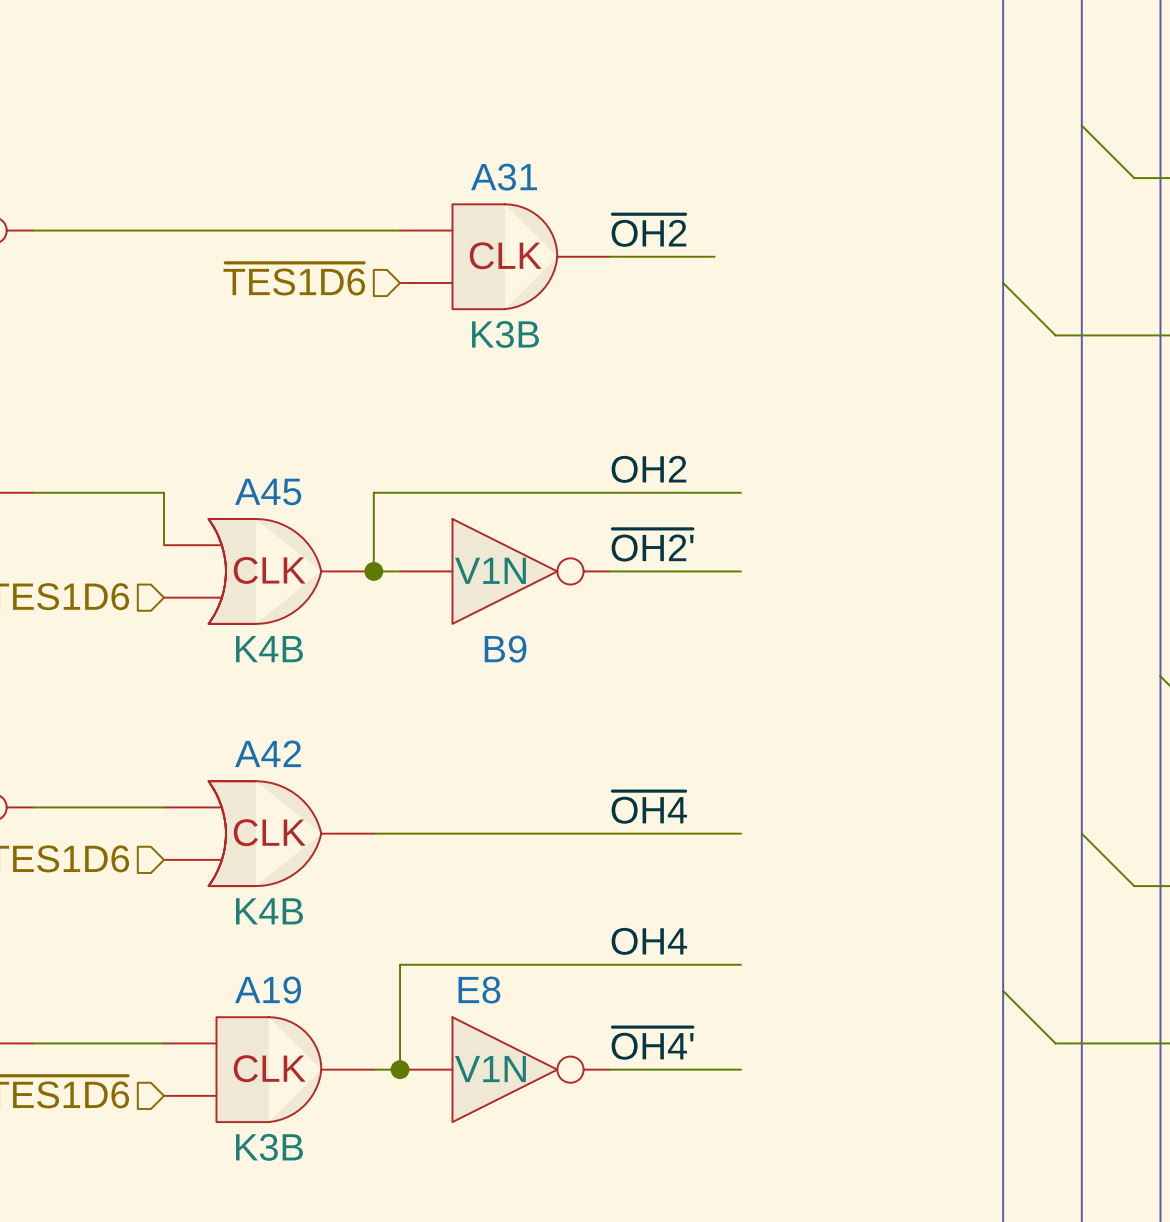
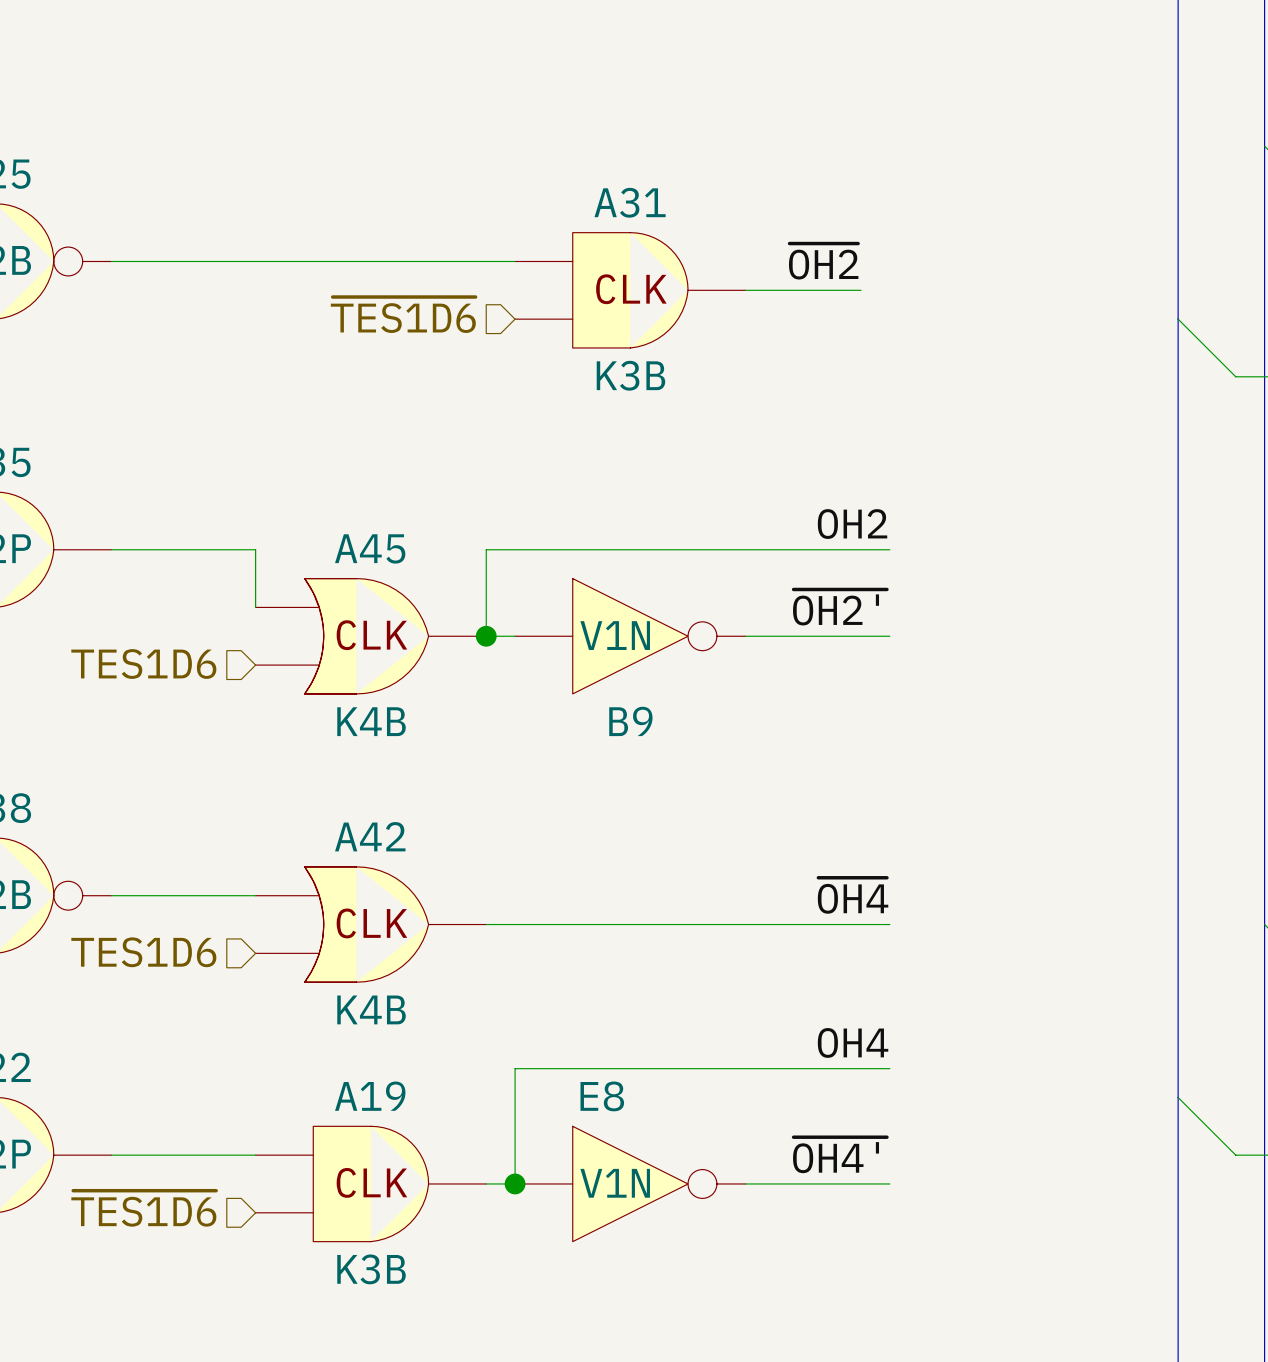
label position: ~{OH2} (648, 230) -> ~{OH2} (823, 261)
label position: OH2 (648, 469) -> OH2 (852, 524)
label position: ~{OH2'} (652, 545) -> ~{OH2'} (839, 607)
label position: ~{OH4} (649, 807) -> ~{OH4} (853, 895)
label position: OH4 (649, 941) -> OH4 (853, 1042)
label position: ~{OH4'} (652, 1043) -> ~{OH4'} (839, 1155)

